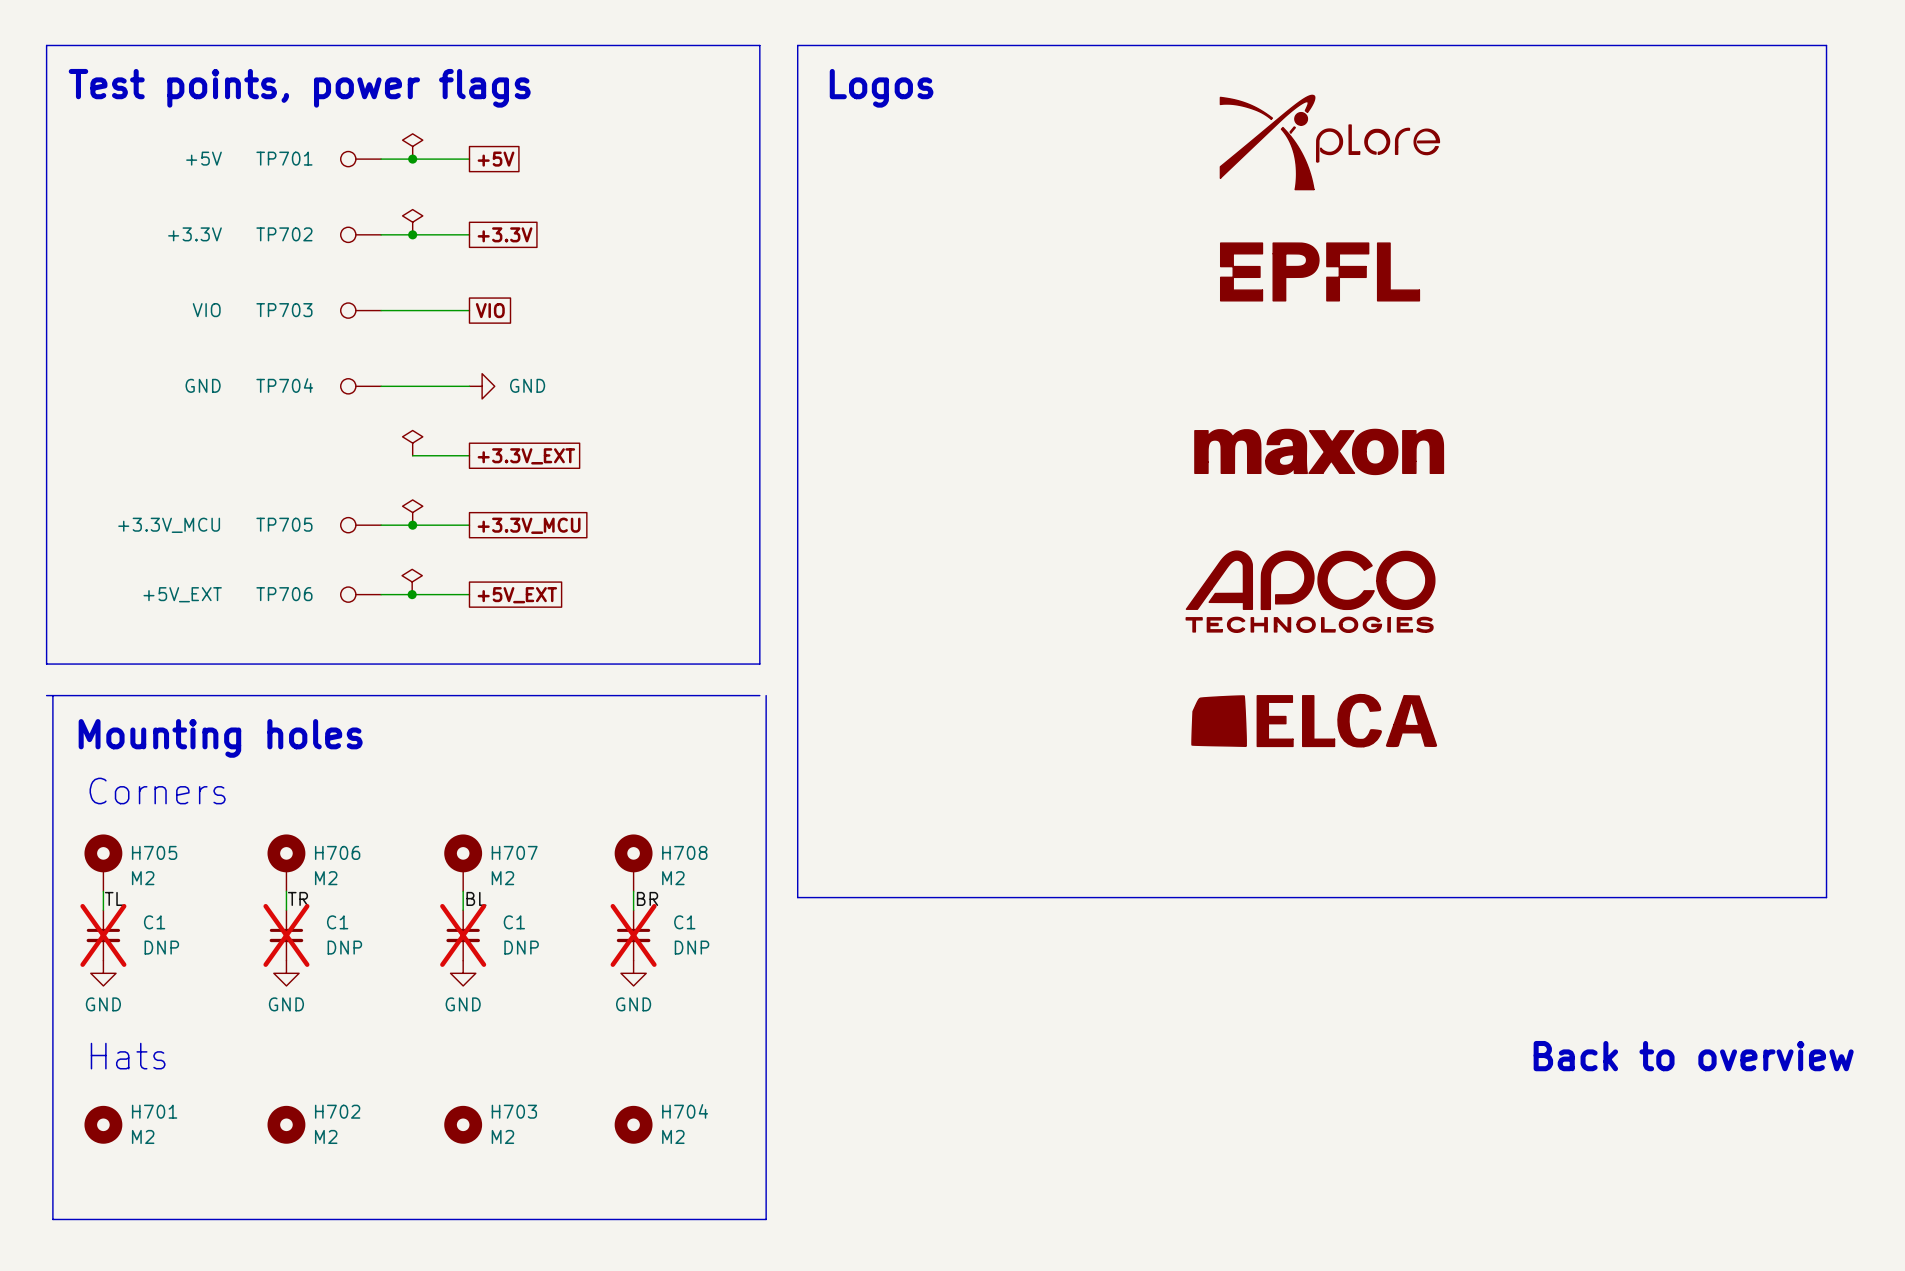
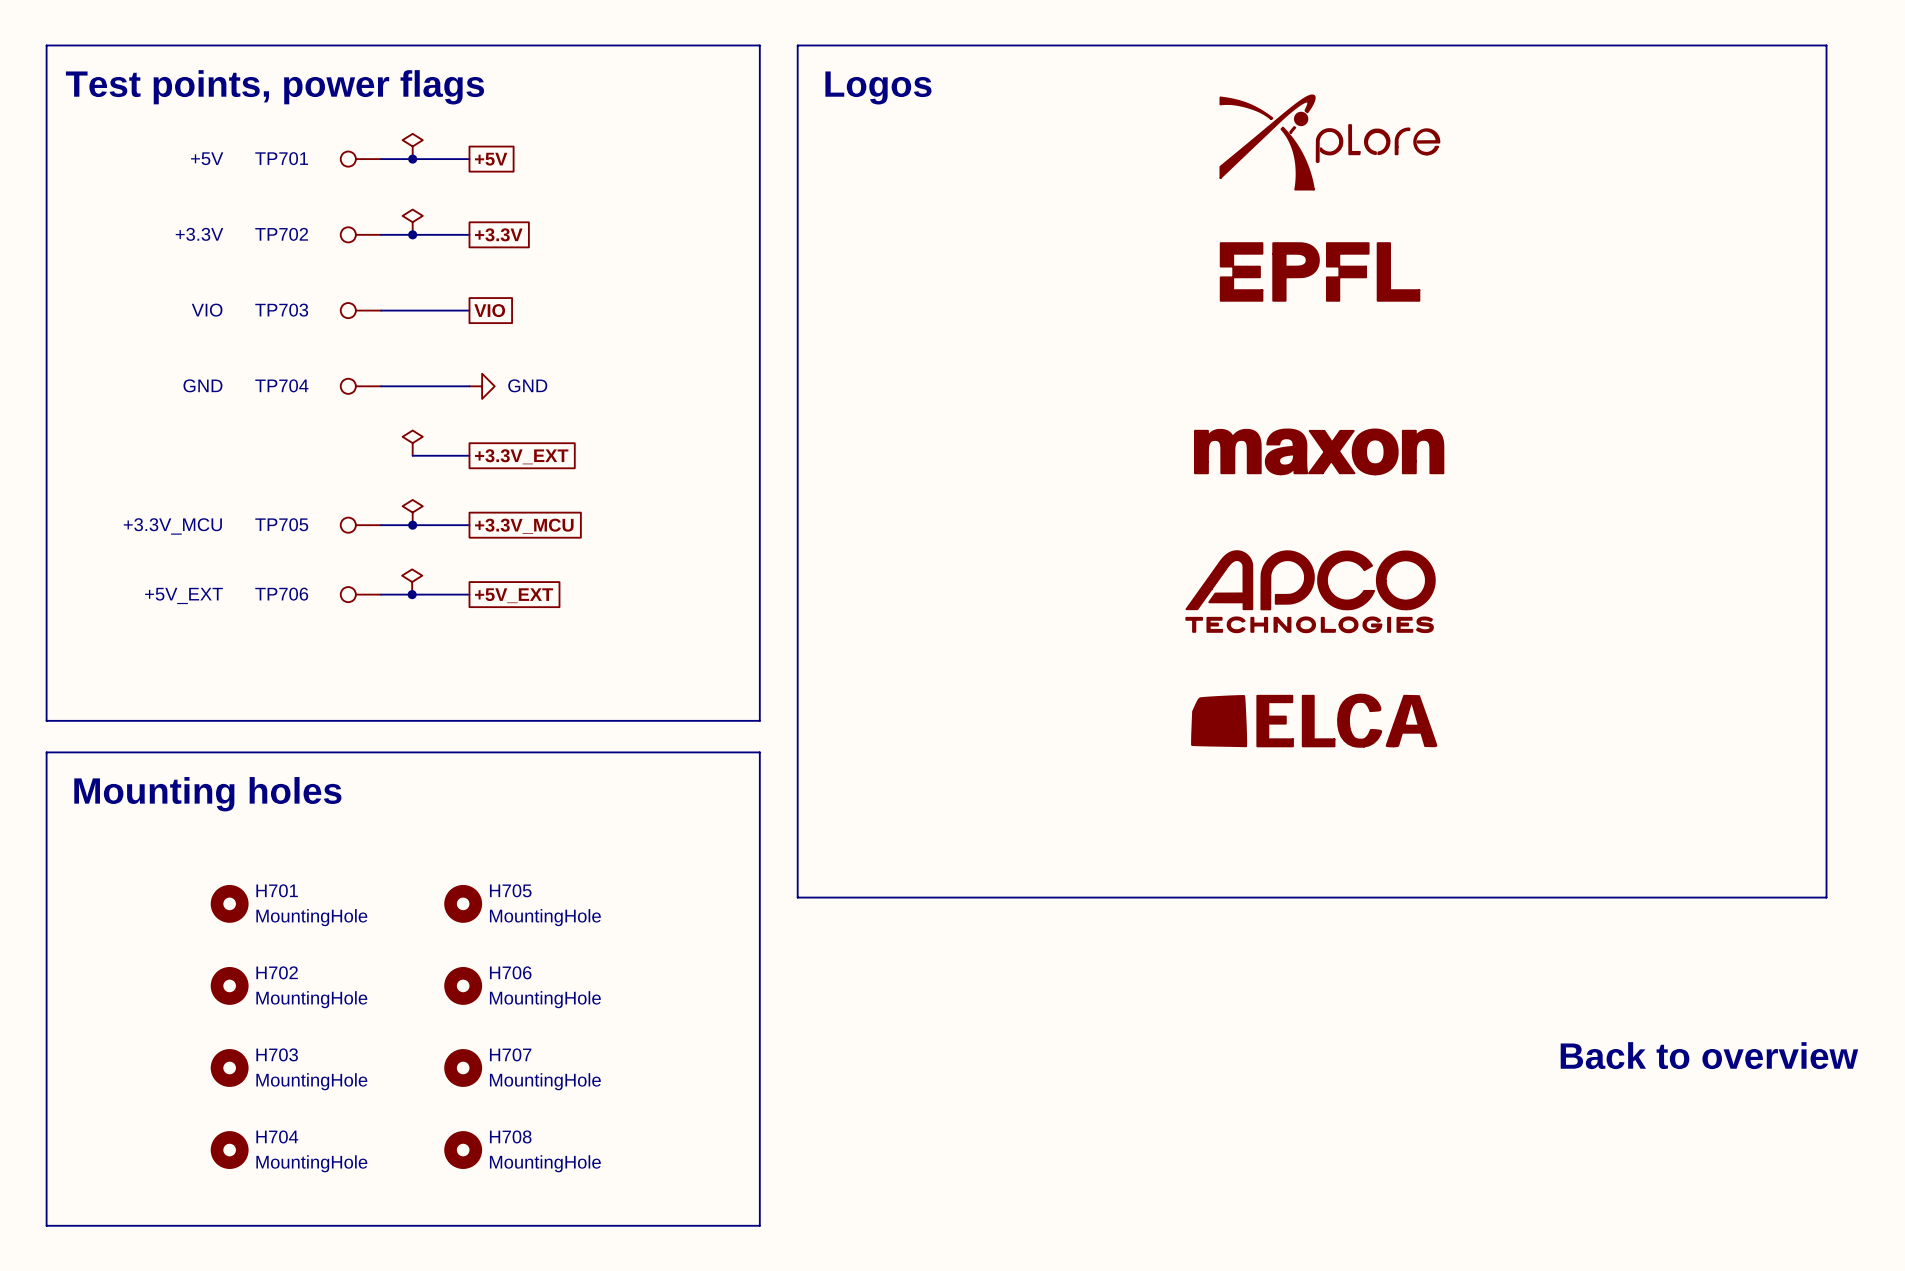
line: (46, 664) (759, 664) -> (46, 664) (46, 720) (759, 720) (759, 664)
line: (46, 695) (759, 695) -> none
line: (52, 695) (52, 1219) (766, 1219) (766, 695) -> none
text position: Mounting holes (220, 738) -> Mounting holes (207, 794)
line: none -> (46, 752) (46, 1225) (759, 1225) (759, 752) (46, 752)
text: Corners (157, 791) -> none
H705 symbol: [84, 834, 123, 892] -> [444, 884, 483, 923]
H706 symbol: [267, 834, 306, 892] -> [444, 967, 483, 1005]
H707 symbol: [444, 834, 483, 892] -> [444, 1049, 483, 1087]
H708 symbol: [614, 834, 653, 892] -> [444, 1131, 483, 1169]
H705 value: M2 (143, 878) -> MountingHole (545, 917)
H706 value: M2 (326, 878) -> MountingHole (545, 999)
H707 value: M2 (502, 878) -> MountingHole (545, 1081)
H708 value: M2 (673, 878) -> MountingHole (545, 1163)
wire: (103, 891) (103, 910) -> none
wire: (286, 891) (286, 910) -> none
wire: (463, 891) (463, 910) -> none
wire: (633, 891) (633, 910) -> none
label: TL (114, 898) -> none
label: TR (297, 898) -> none
label: BL (476, 898) -> none
label: BR (647, 898) -> none
C1: DNP (103, 935) -> none
C1: DNP (286, 935) -> none
C1: DNP (463, 935) -> none
C1: DNP (633, 935) -> none
power symbol: GND (103, 973) -> none
power symbol: GND (286, 973) -> none
power symbol: GND (463, 973) -> none
power symbol: GND (633, 973) -> none
text: Hats (128, 1056) -> none
H701 position: (103, 1124) -> (229, 903)
H702 position: (286, 1124) -> (229, 985)
H703 position: (463, 1124) -> (229, 1067)
H704 position: (633, 1124) -> (229, 1150)
H701 value: M2 (143, 1136) -> MountingHole (311, 917)
H702 value: M2 (326, 1136) -> MountingHole (311, 999)
H703 value: M2 (502, 1136) -> MountingHole (311, 1081)
H704 value: M2 (673, 1136) -> MountingHole (311, 1163)

